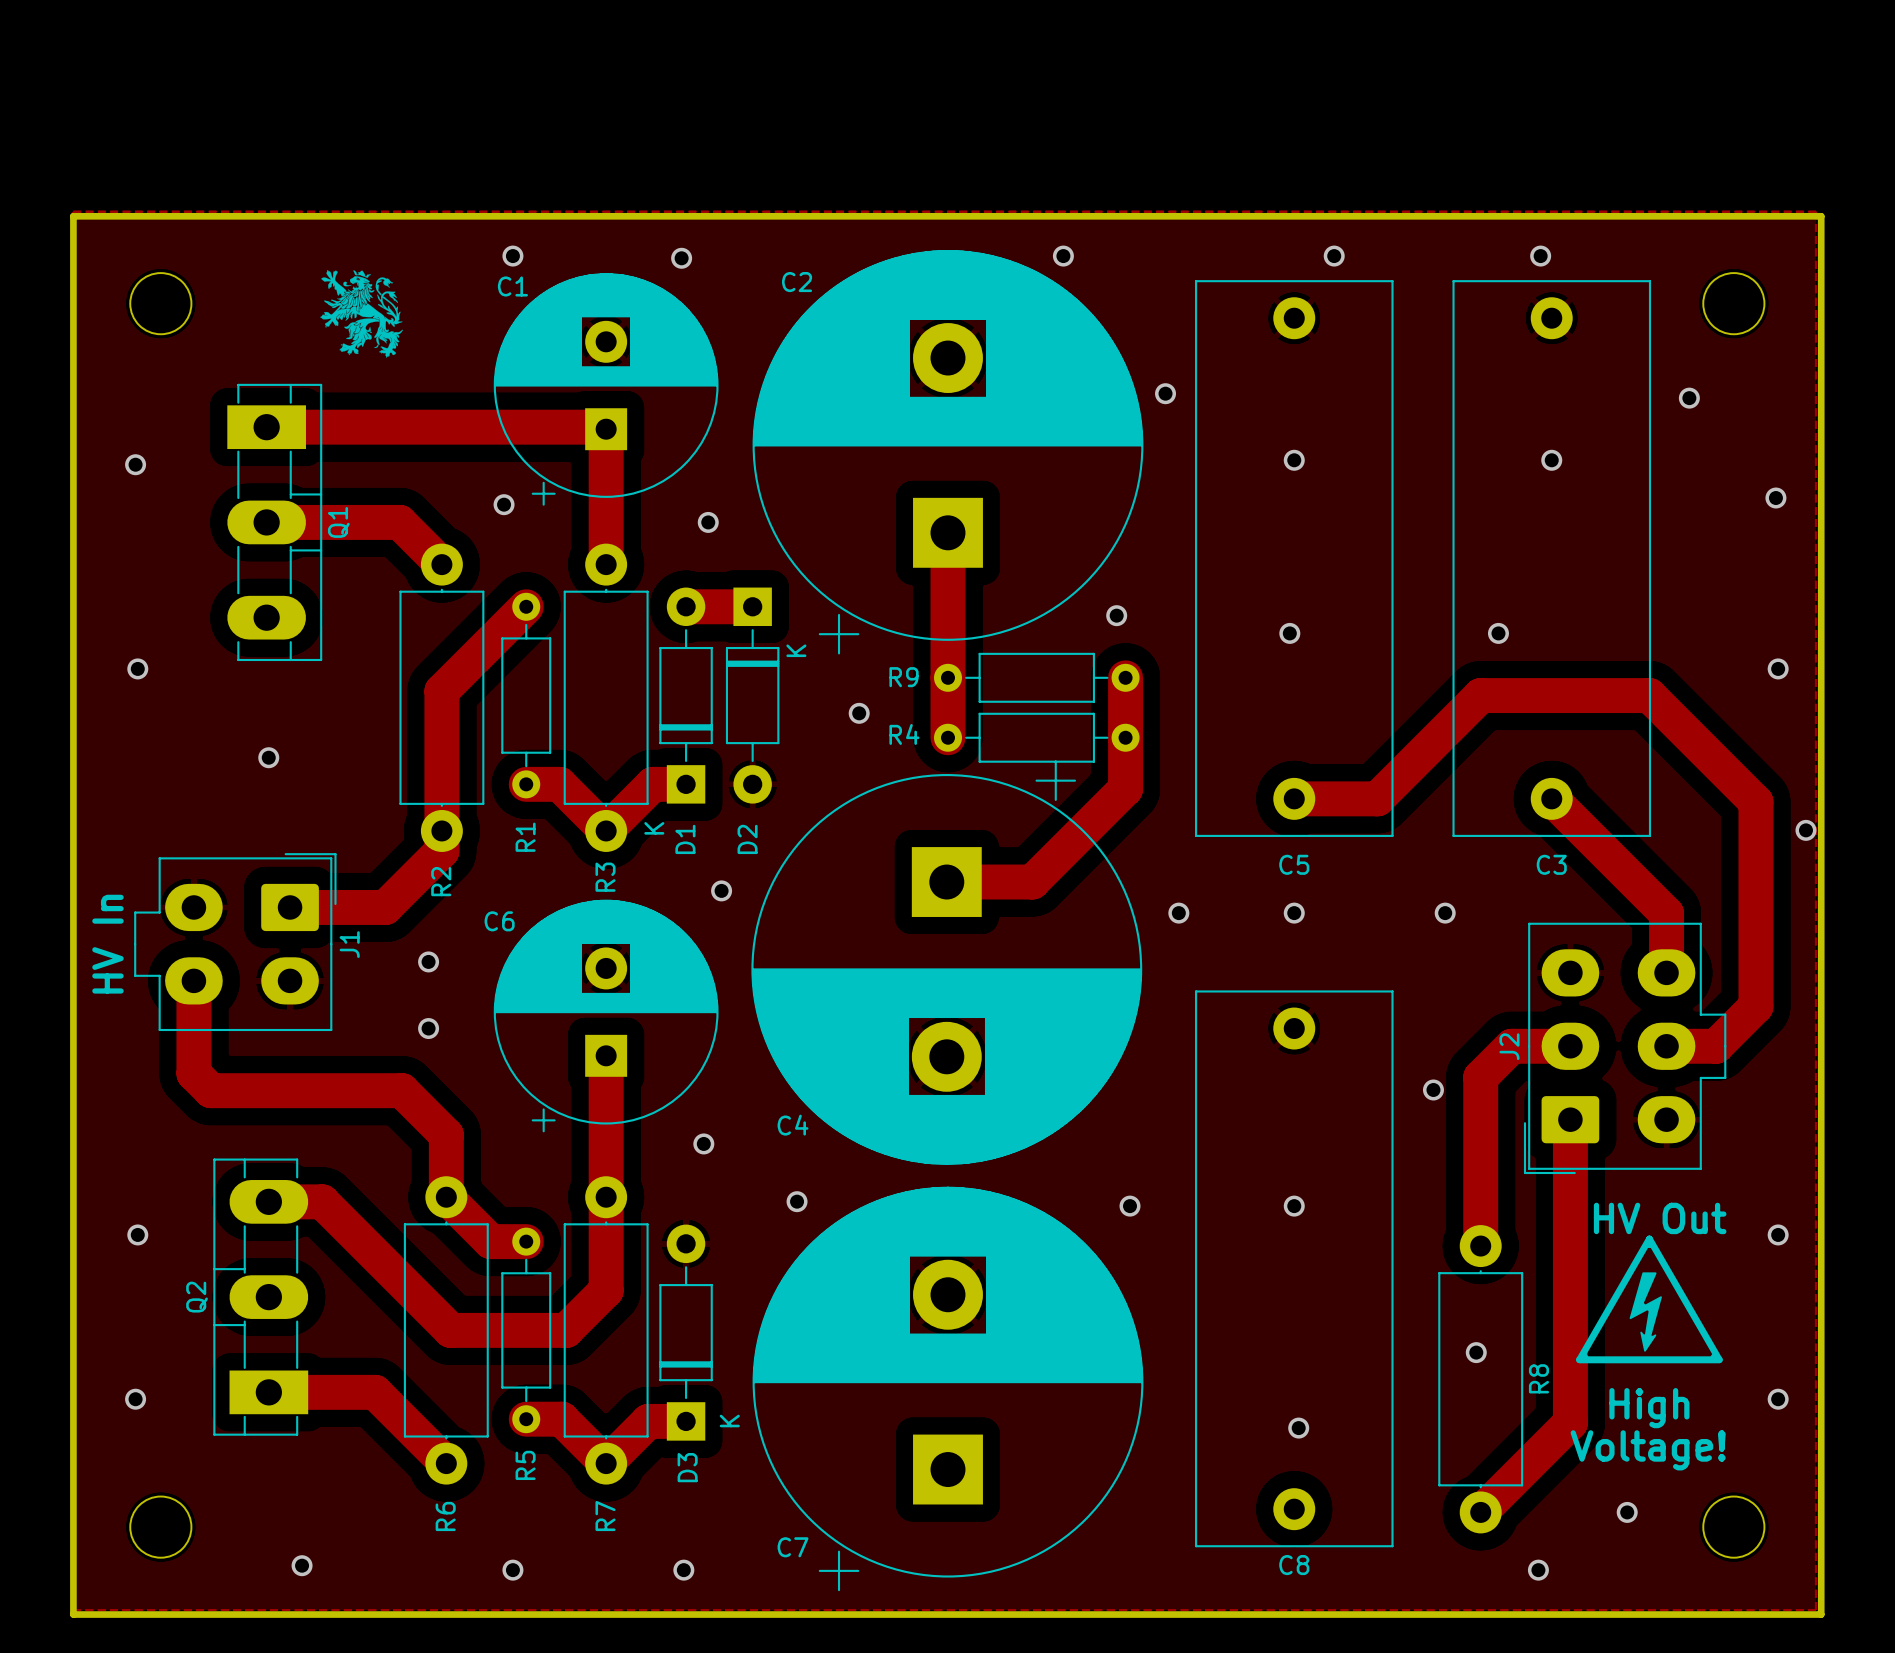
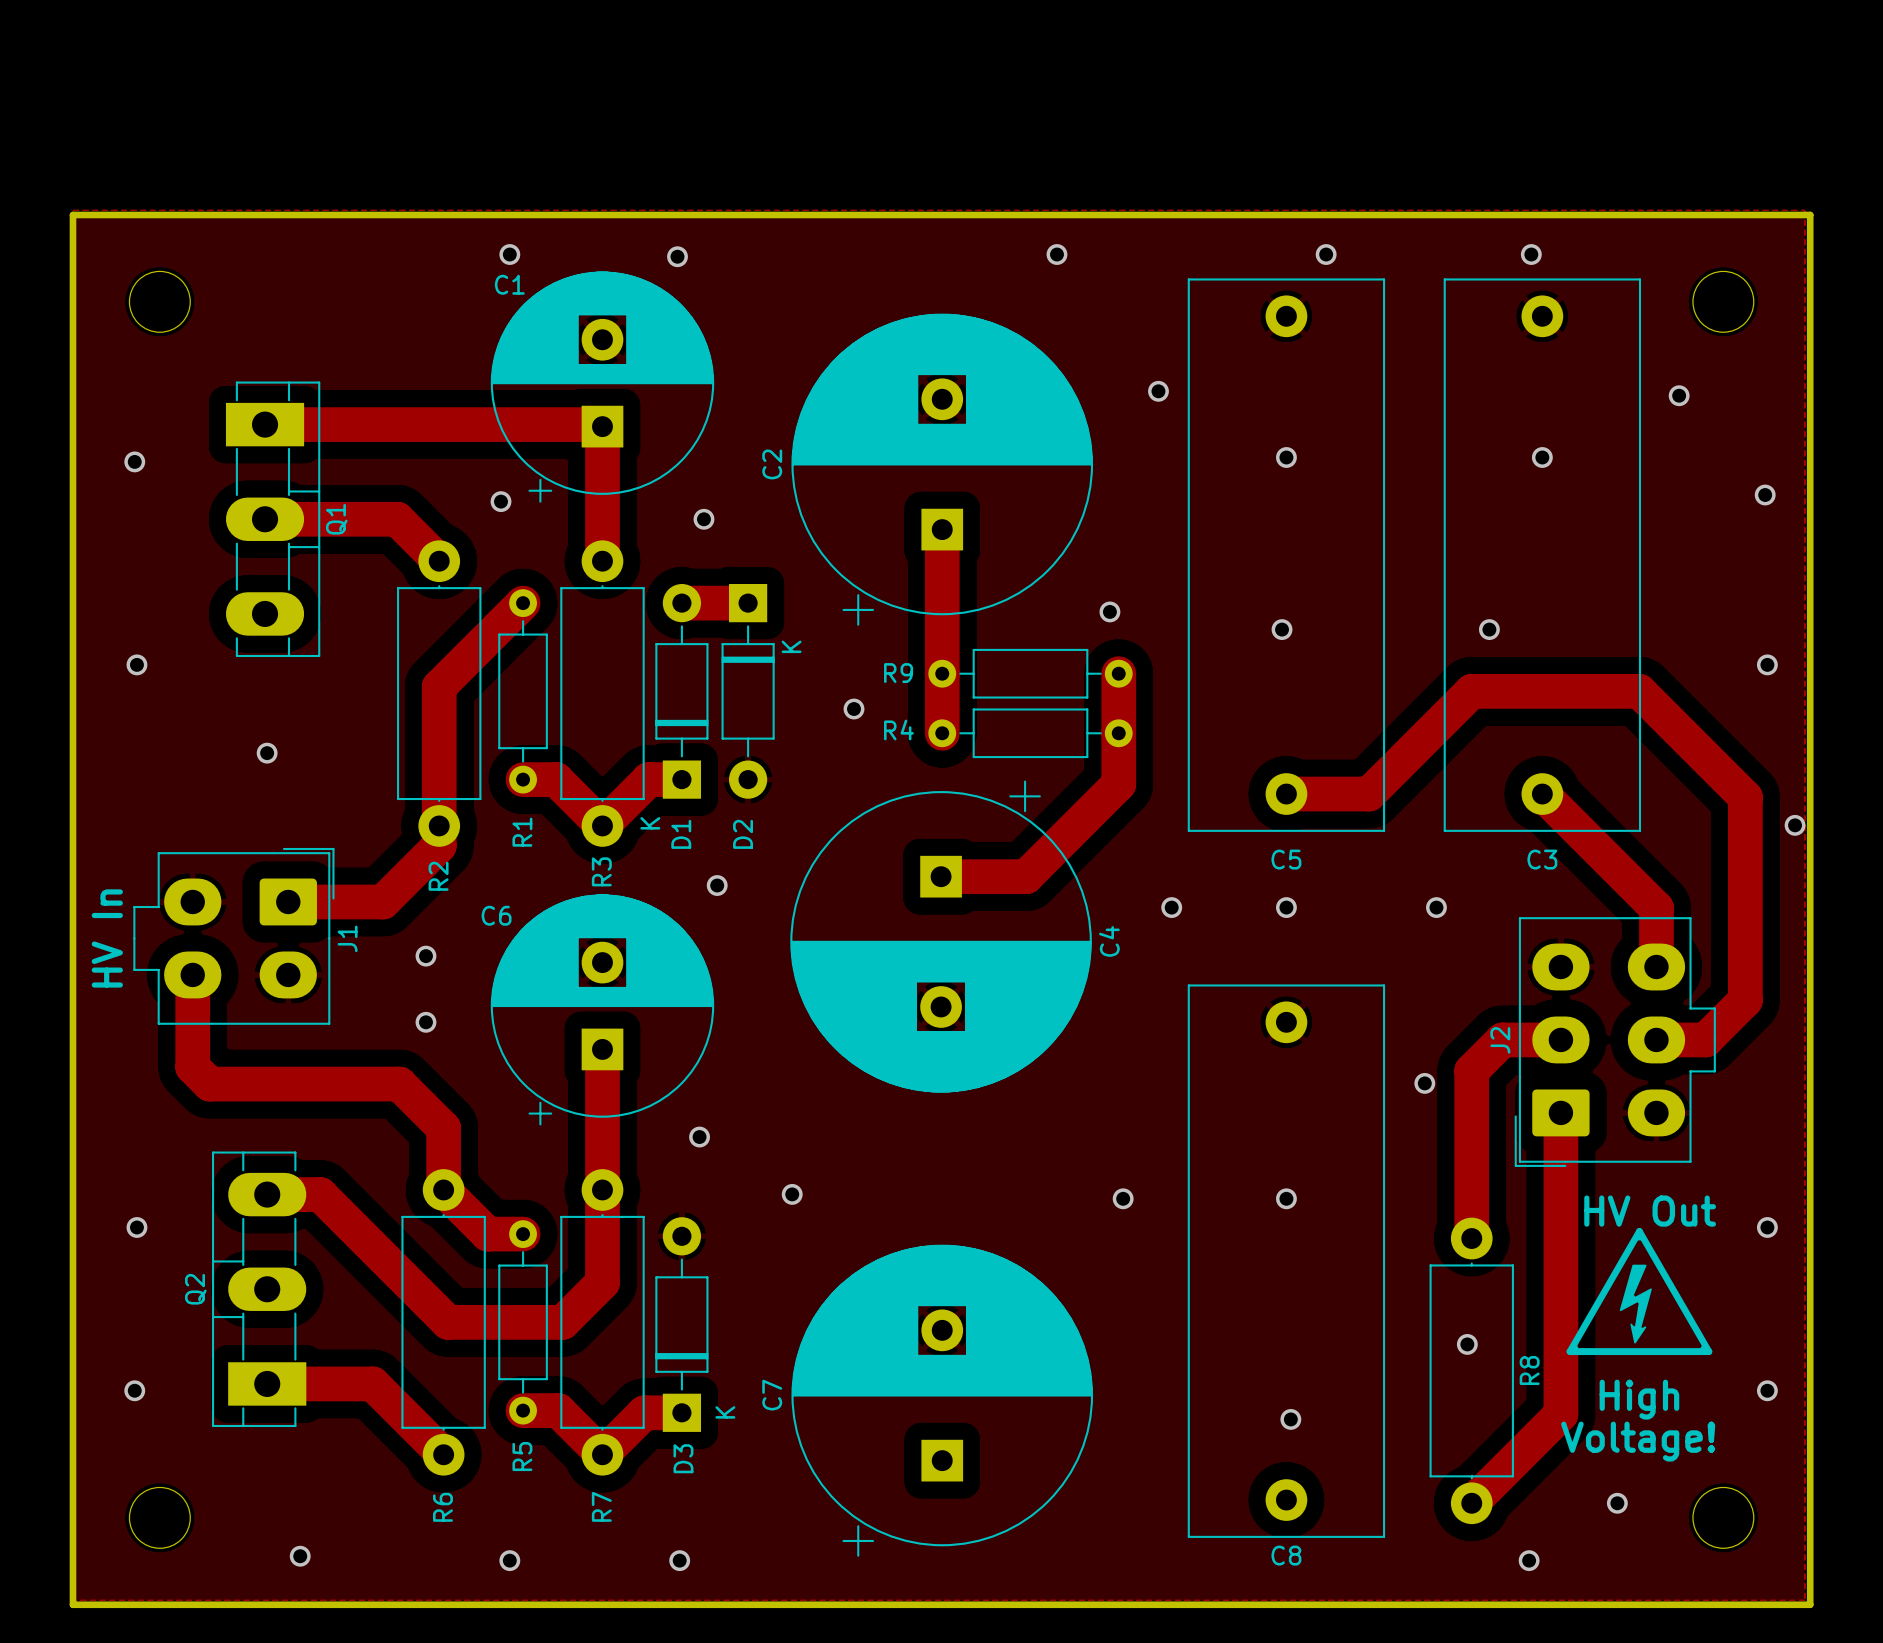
C2 footprint: [752, 250, 1144, 655] -> [791, 313, 1094, 626]
drawing: [320, 270, 403, 358] -> none
C2 name position: C2 (797, 282) -> C2 (772, 464)
C4 footprint: [751, 760, 1143, 1165] -> [790, 780, 1092, 1093]
C4 name position: C4 (793, 1125) -> C4 (1109, 941)
C7 footprint: [752, 1186, 1144, 1592] -> [791, 1244, 1094, 1557]
C7 name position: C7 (793, 1547) -> C7 (772, 1395)

